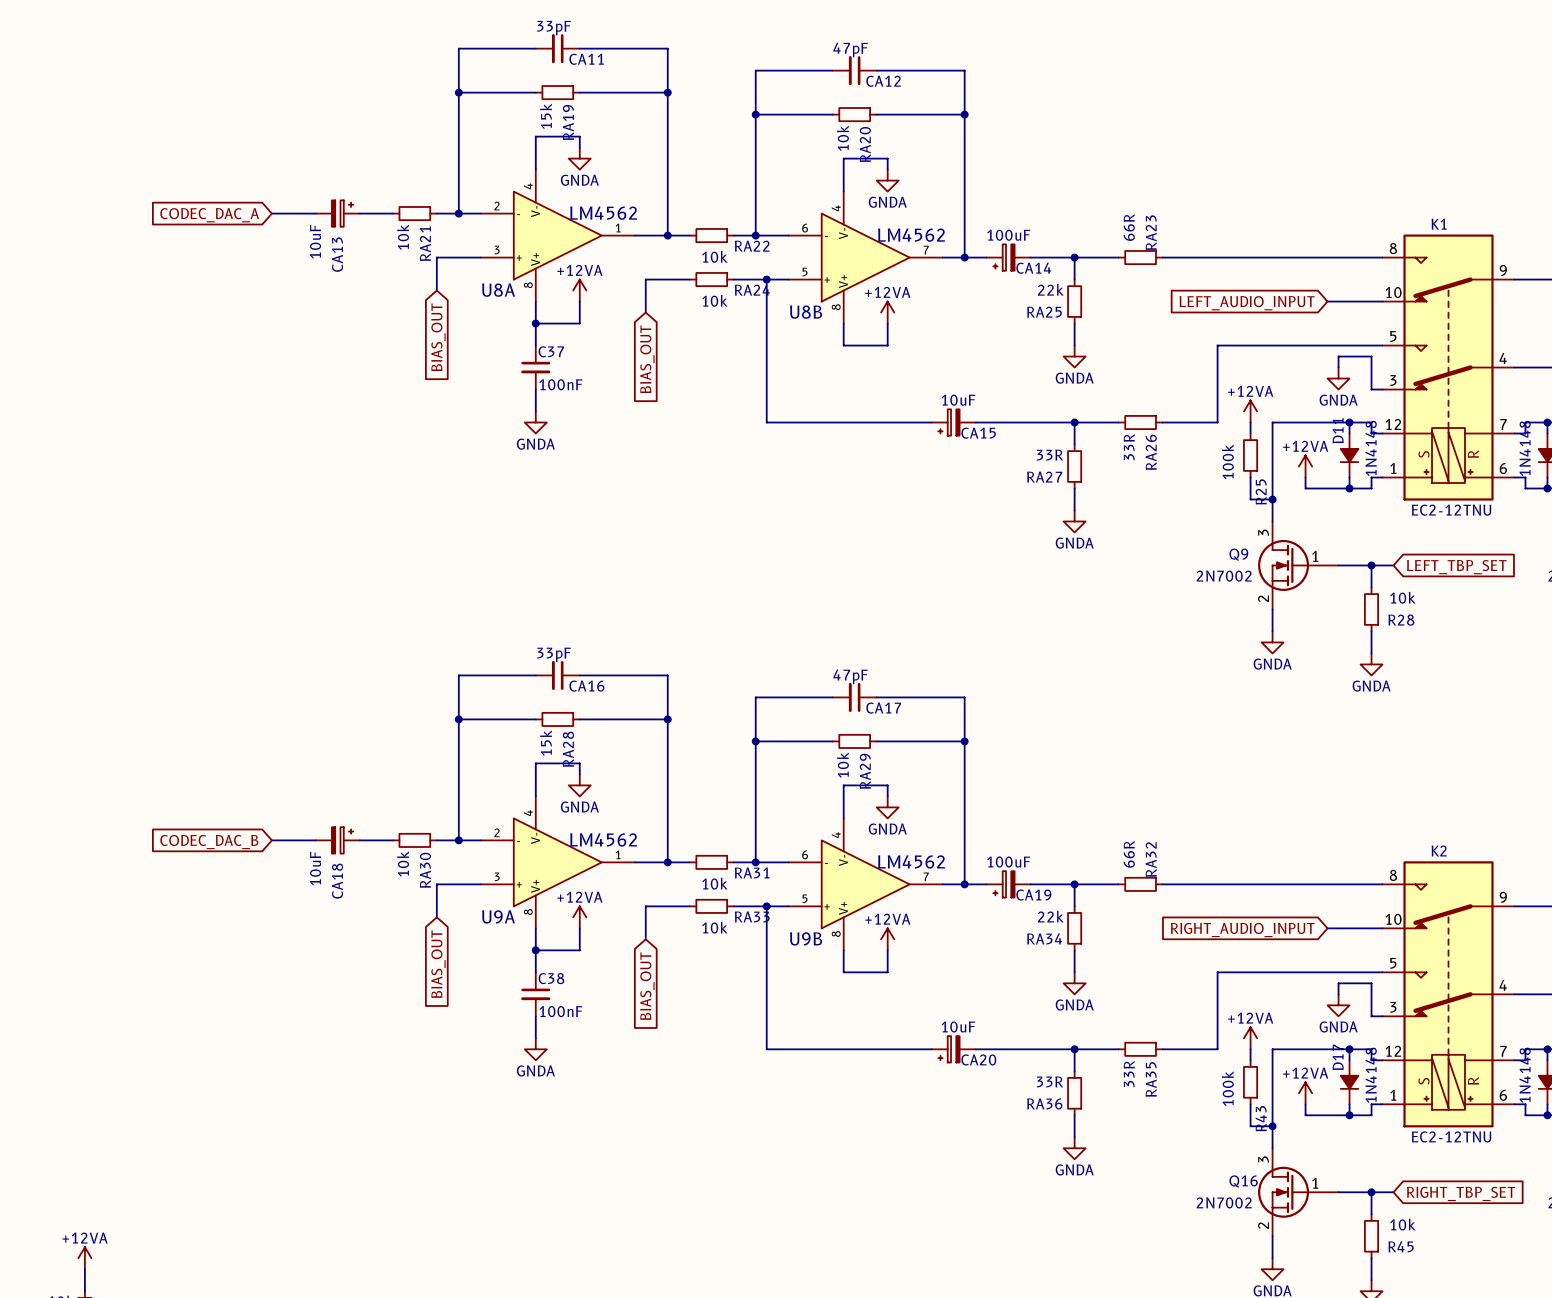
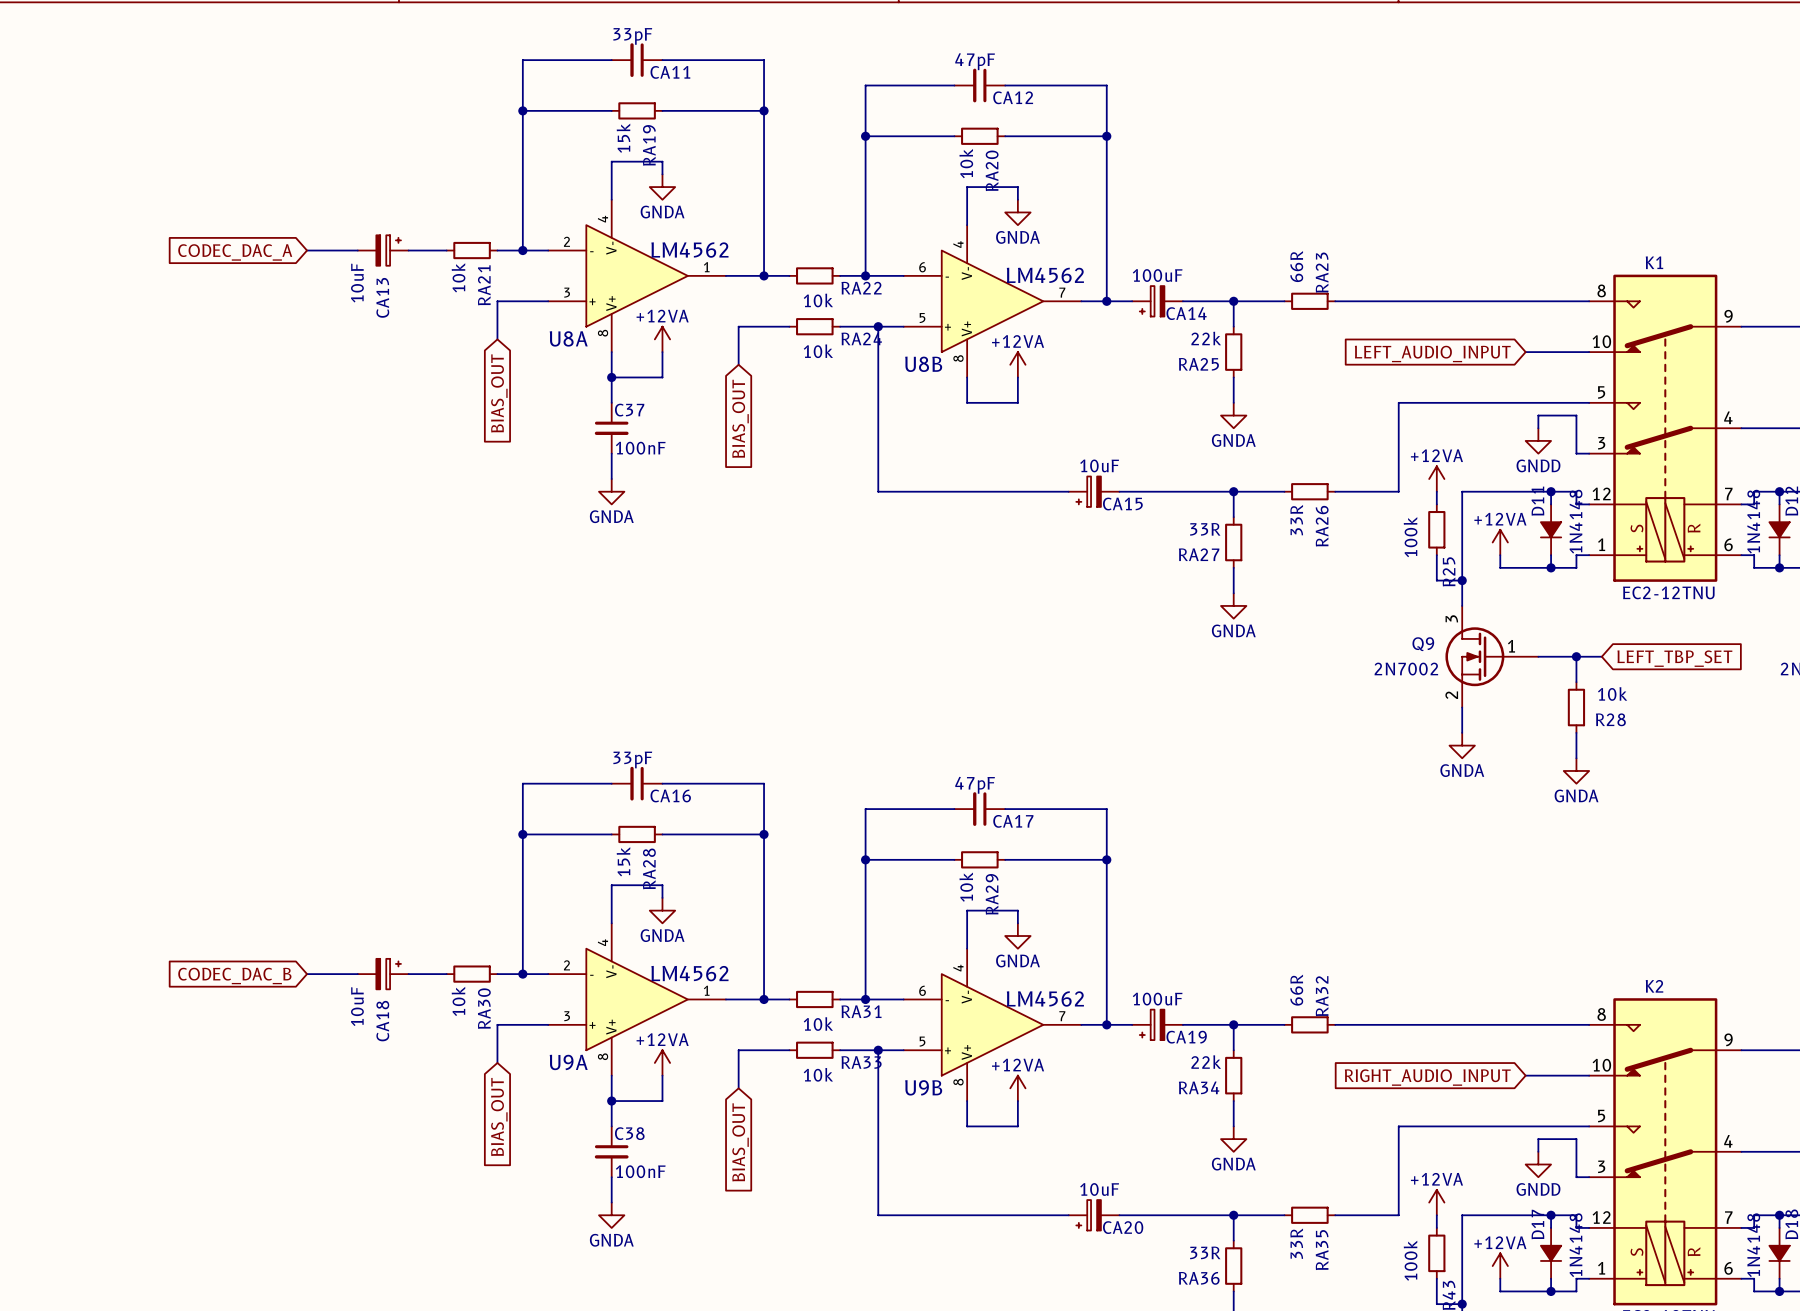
power symbol: GNDA (1338, 378) -> GNDD (1538, 440)
power symbol: GNDA (1338, 1005) -> GNDD (1538, 1164)

